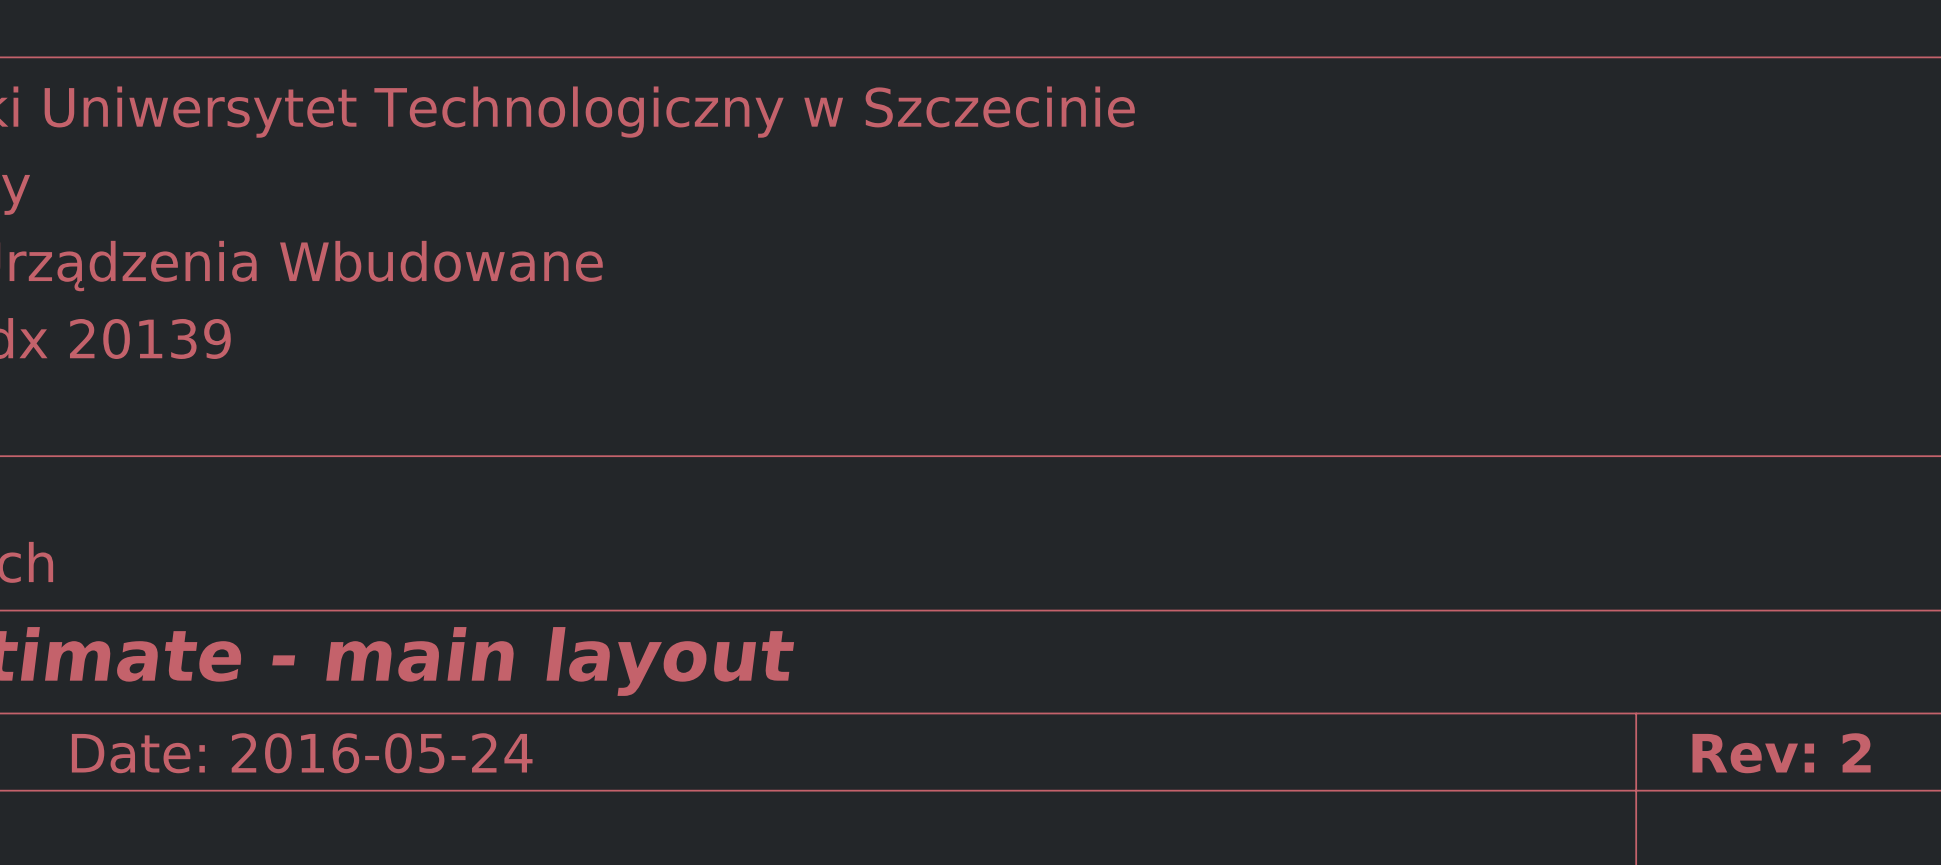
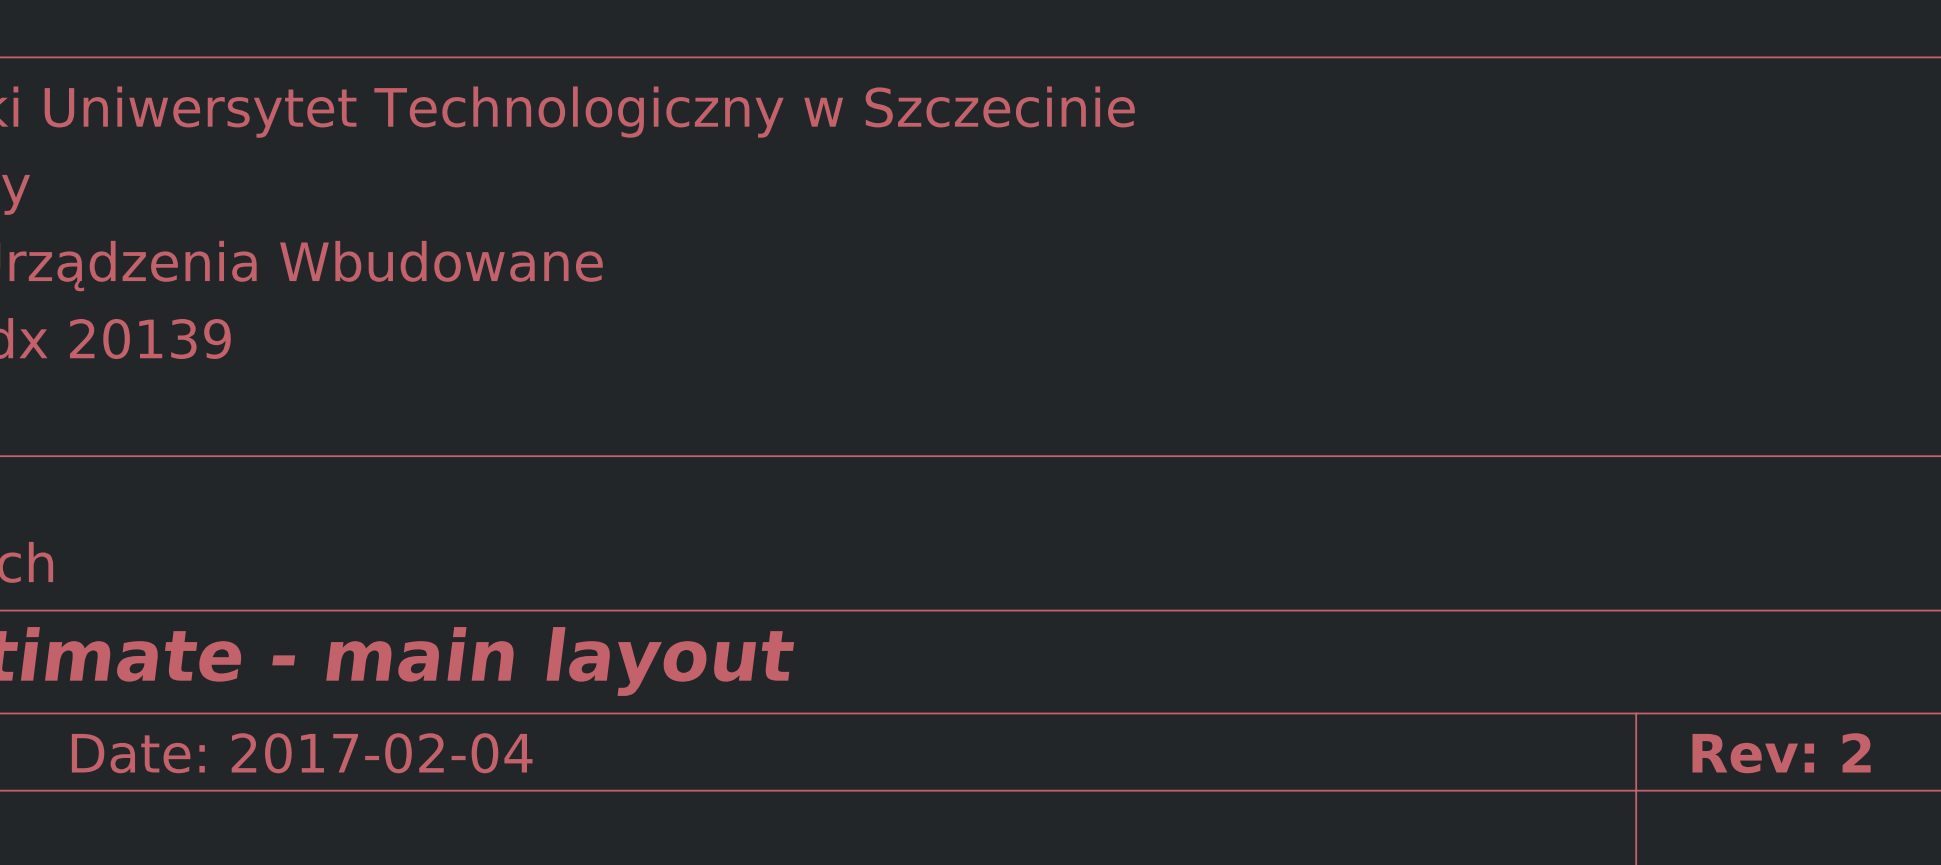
title block: Date: 2016-05-24 (302, 753) -> Date: 2017-02-04 (302, 753)

